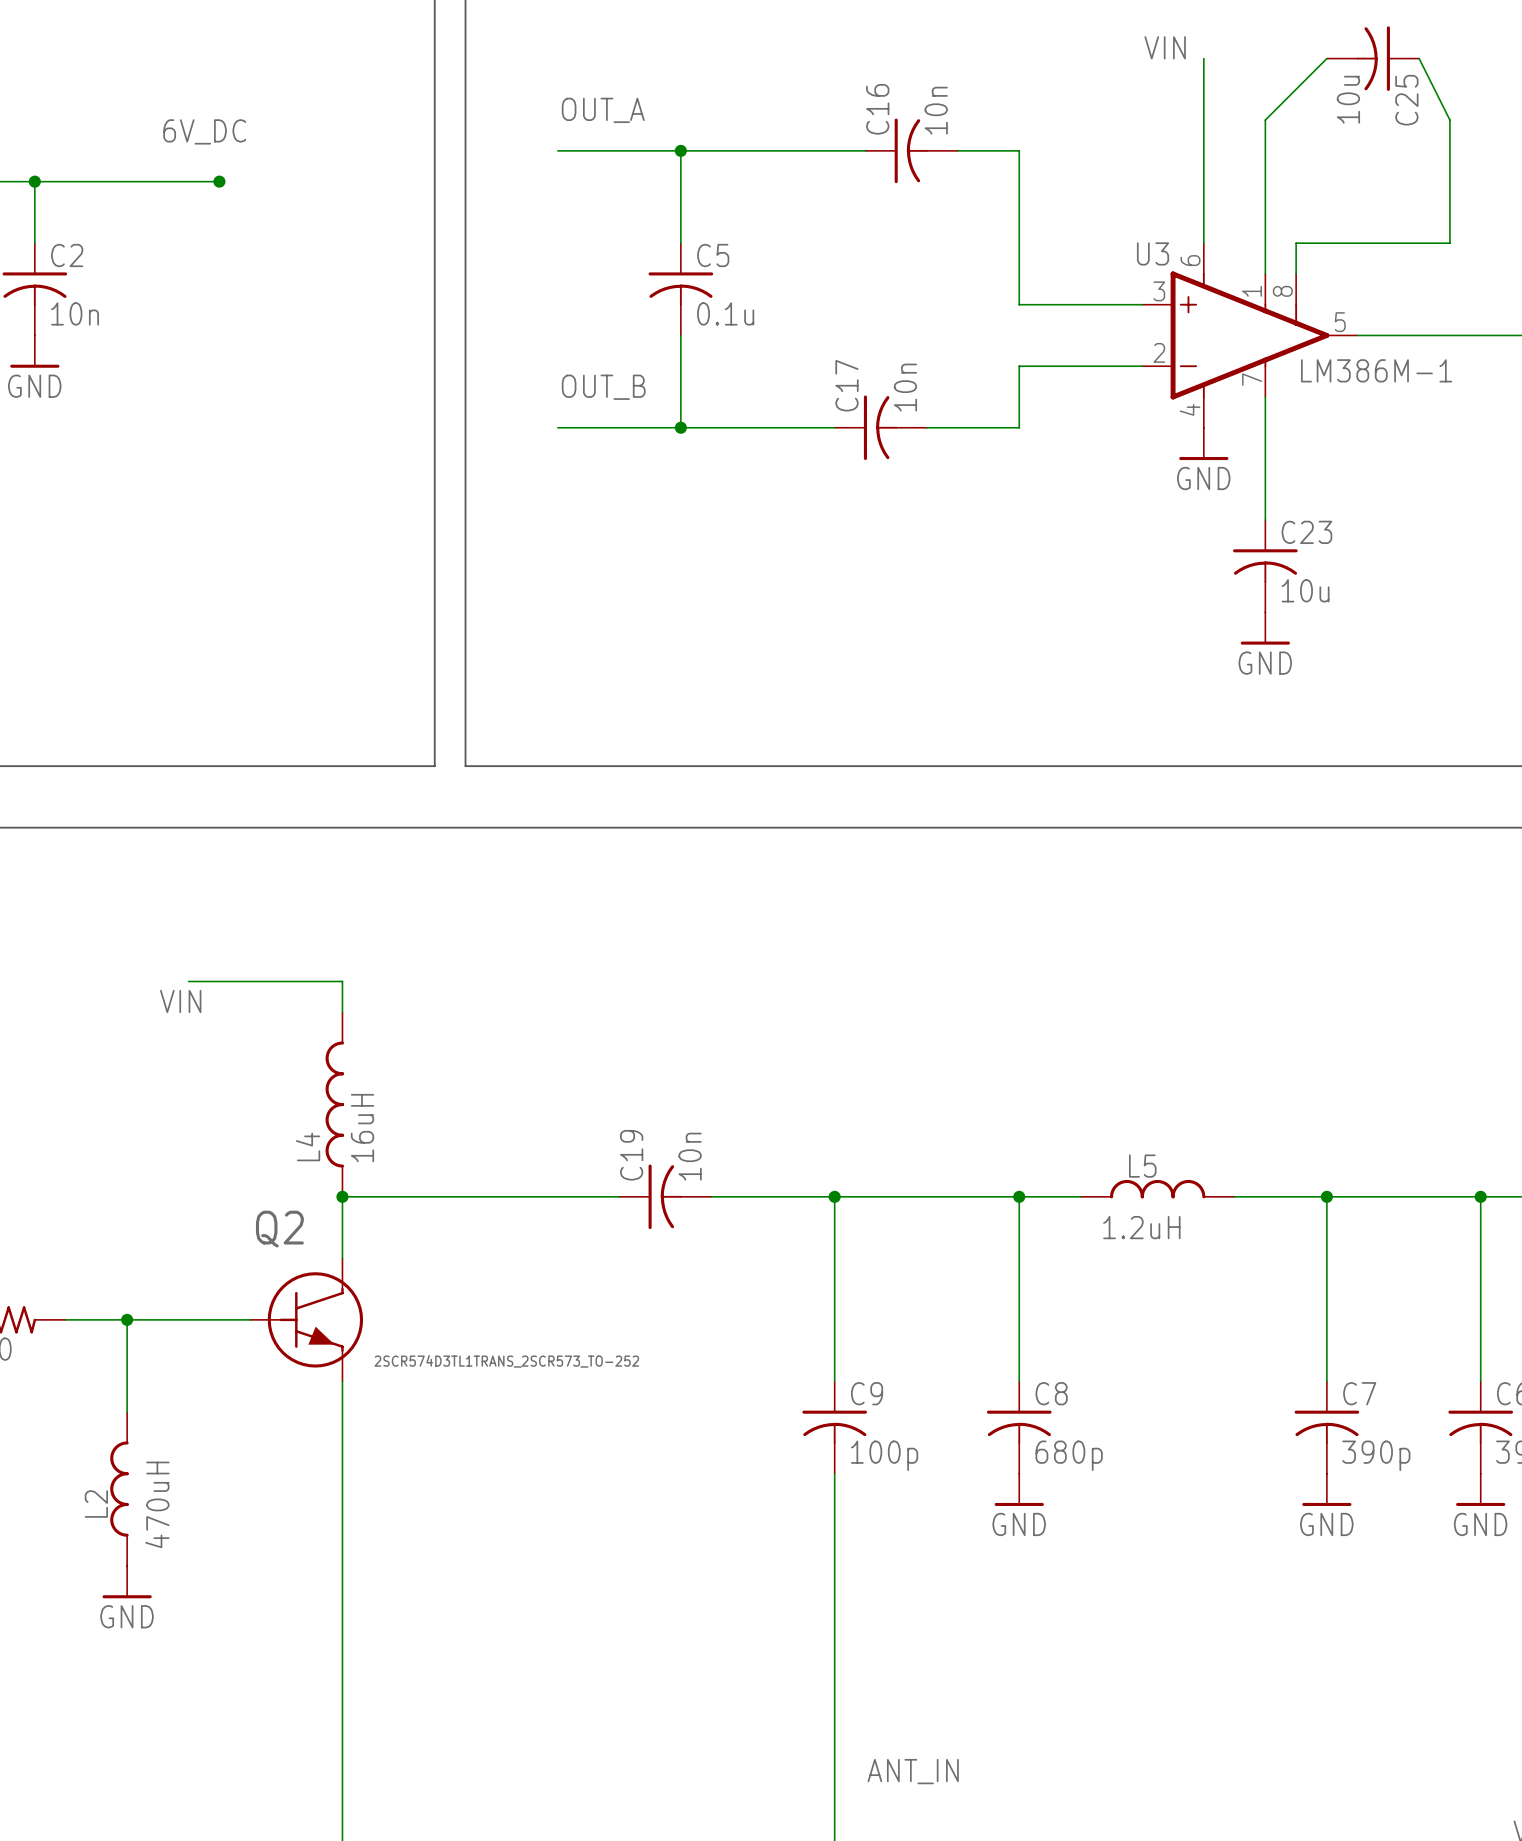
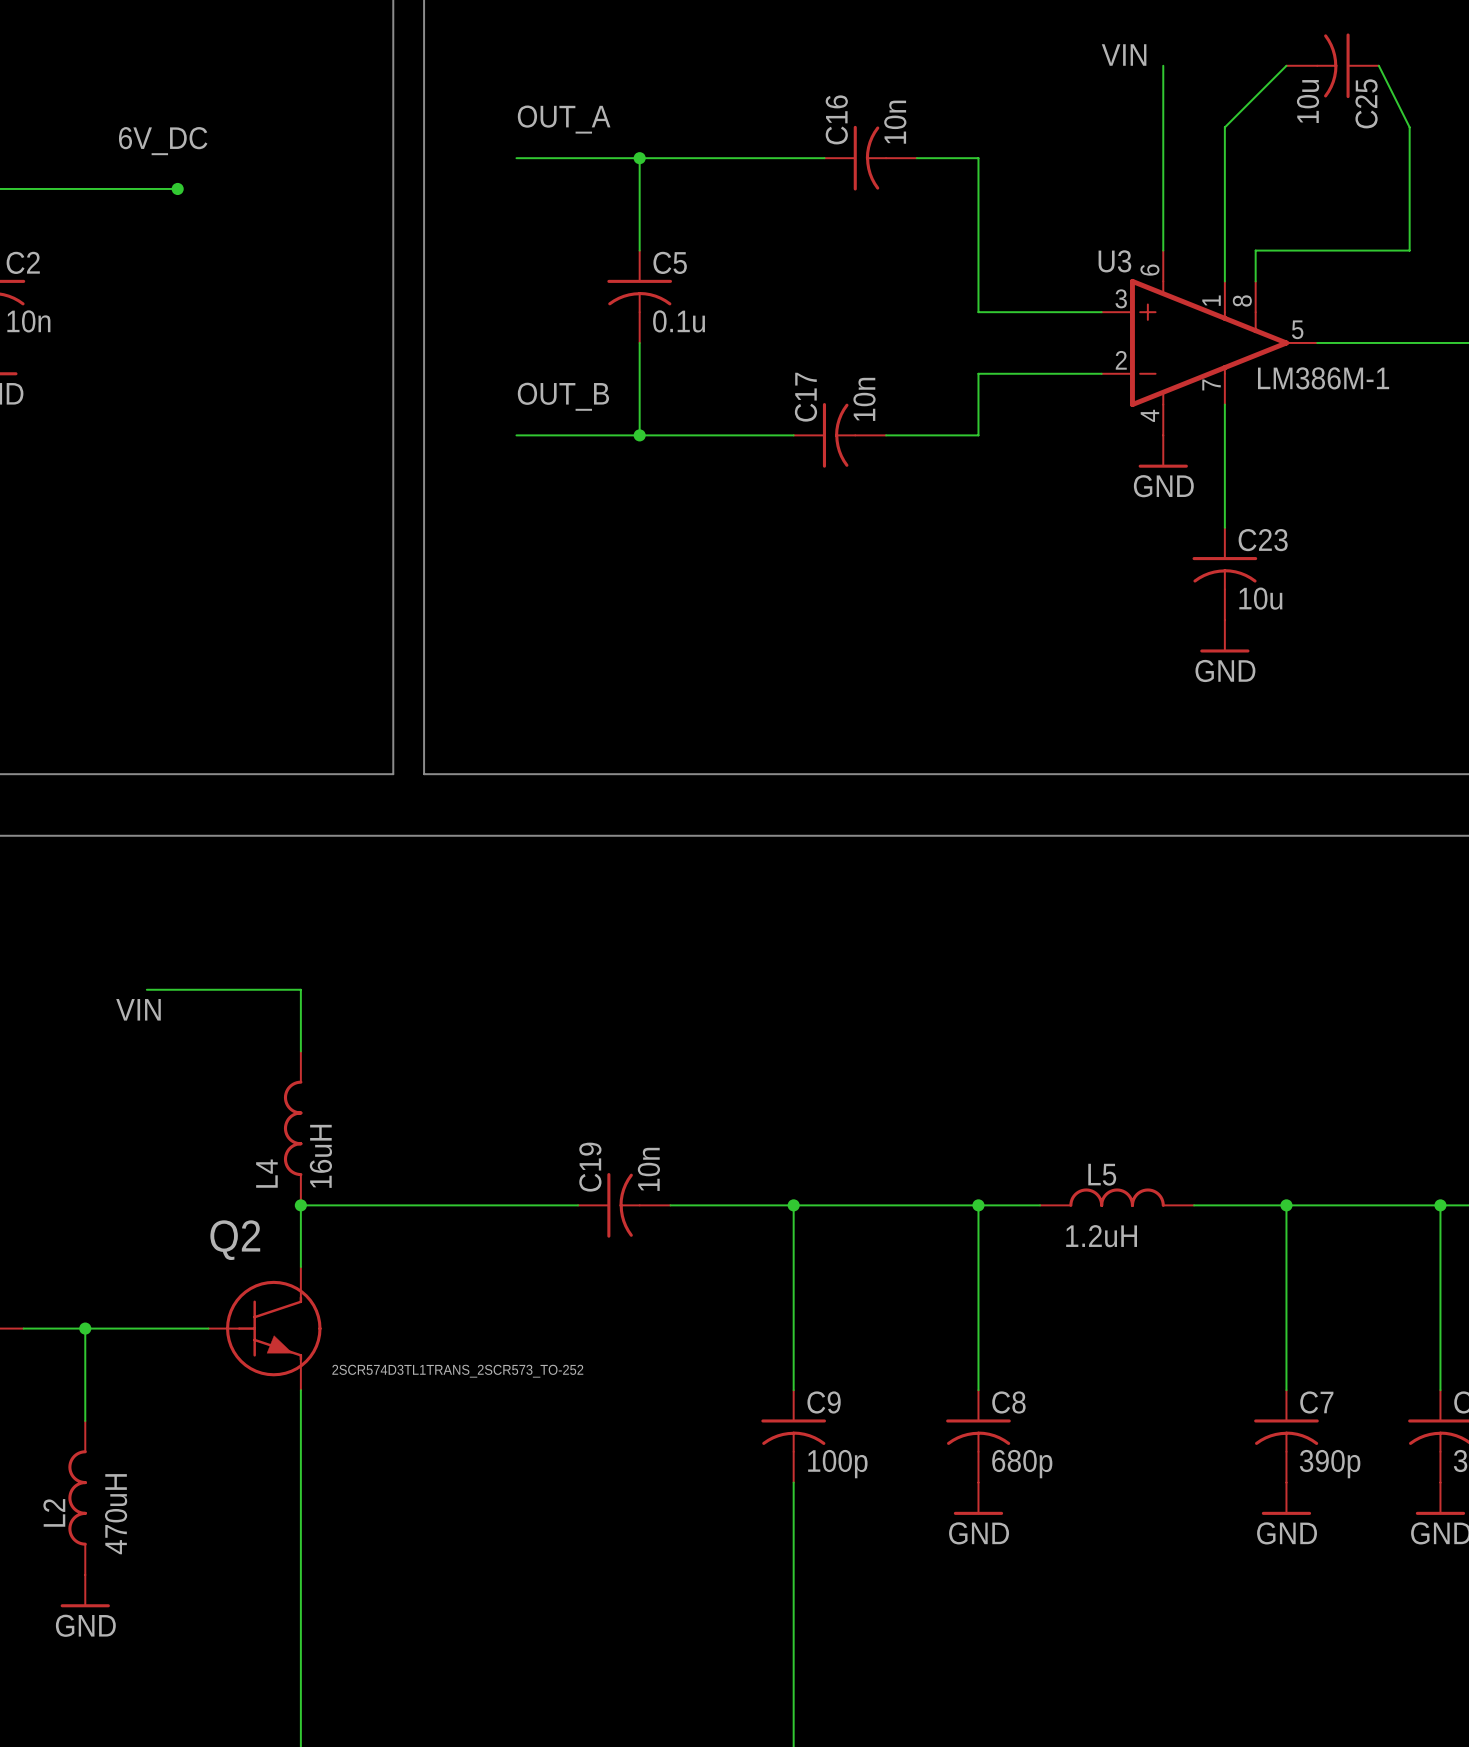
L4 symbol: [325, 1012, 345, 1197] -> [283, 1051, 303, 1206]

